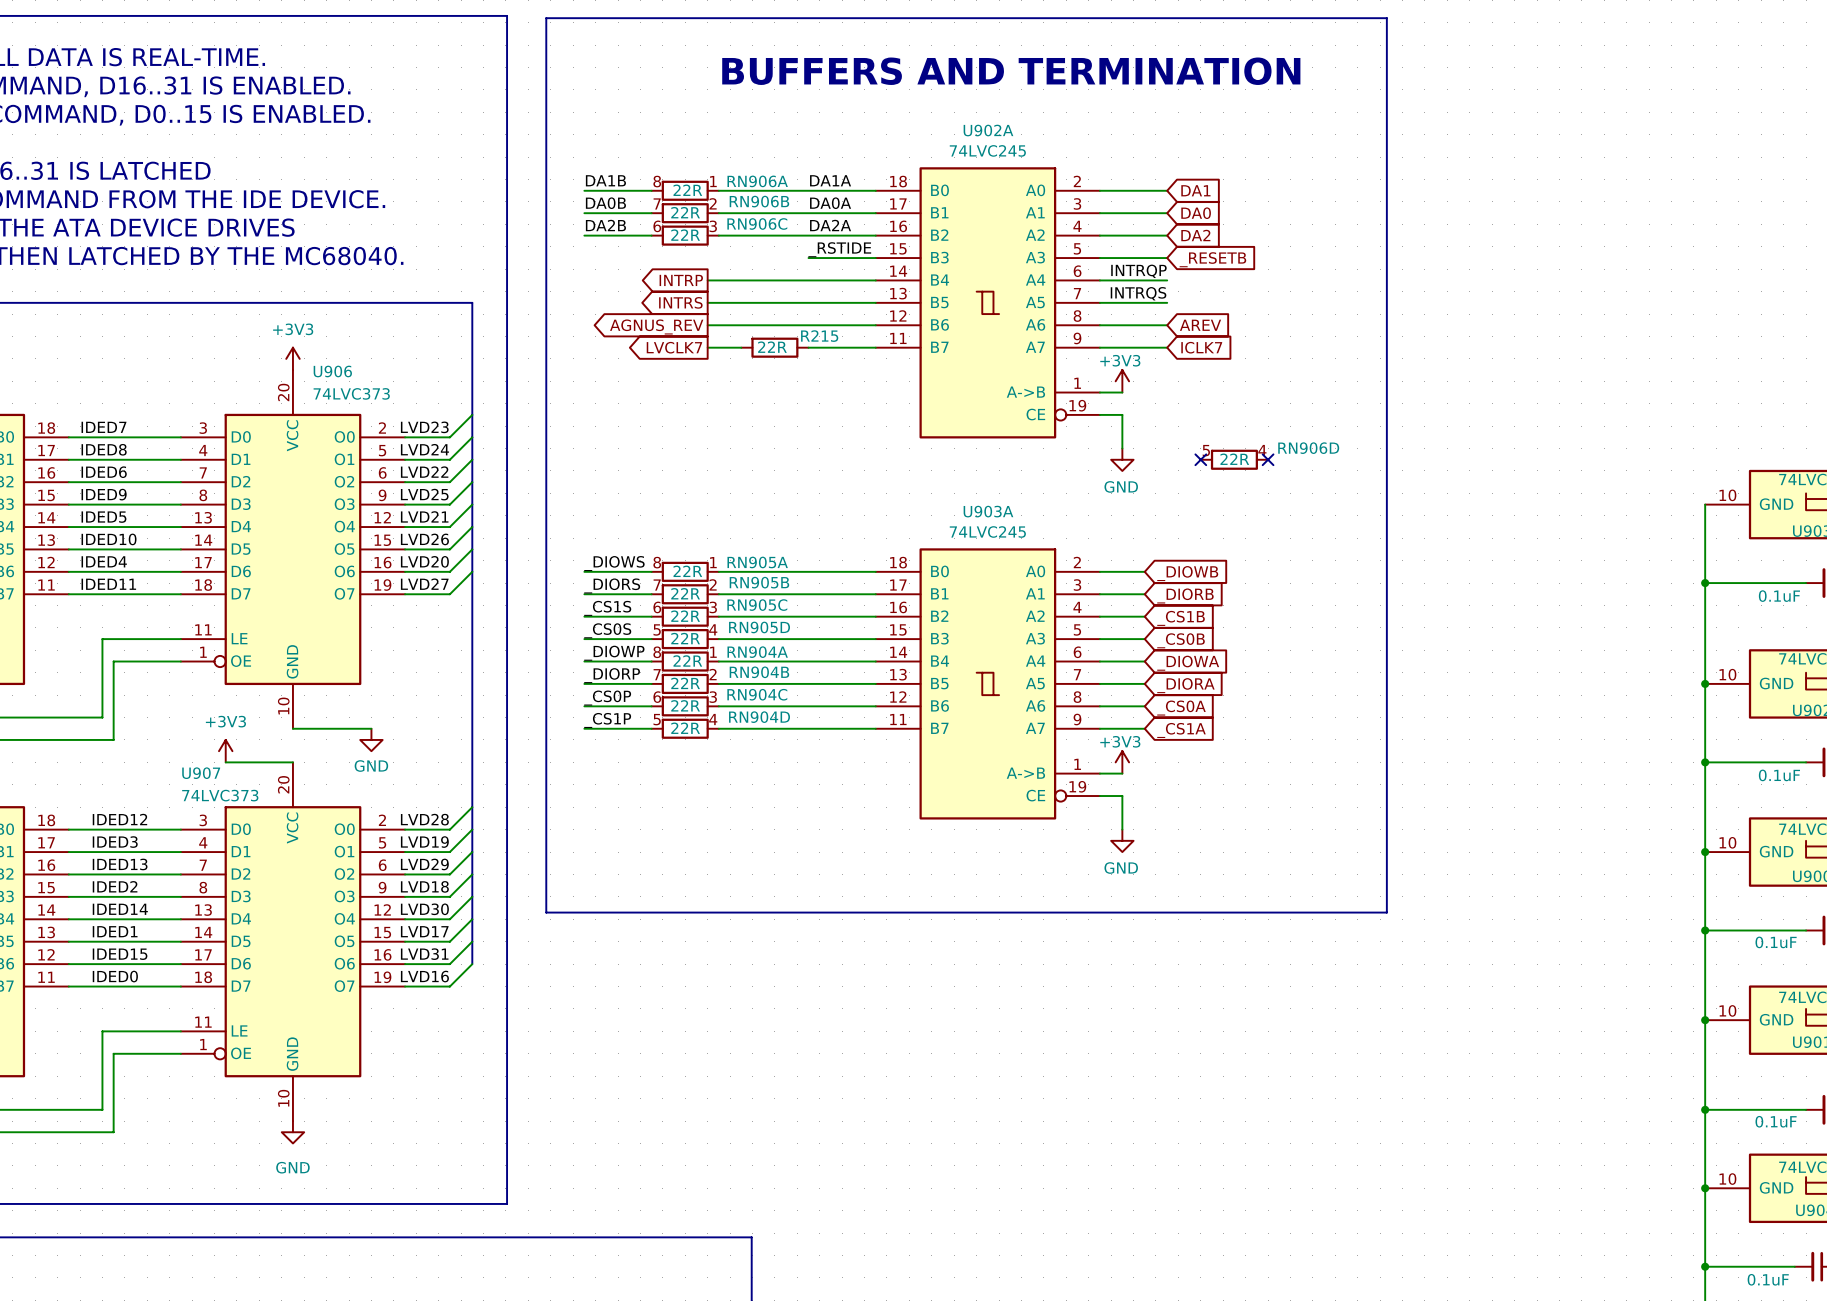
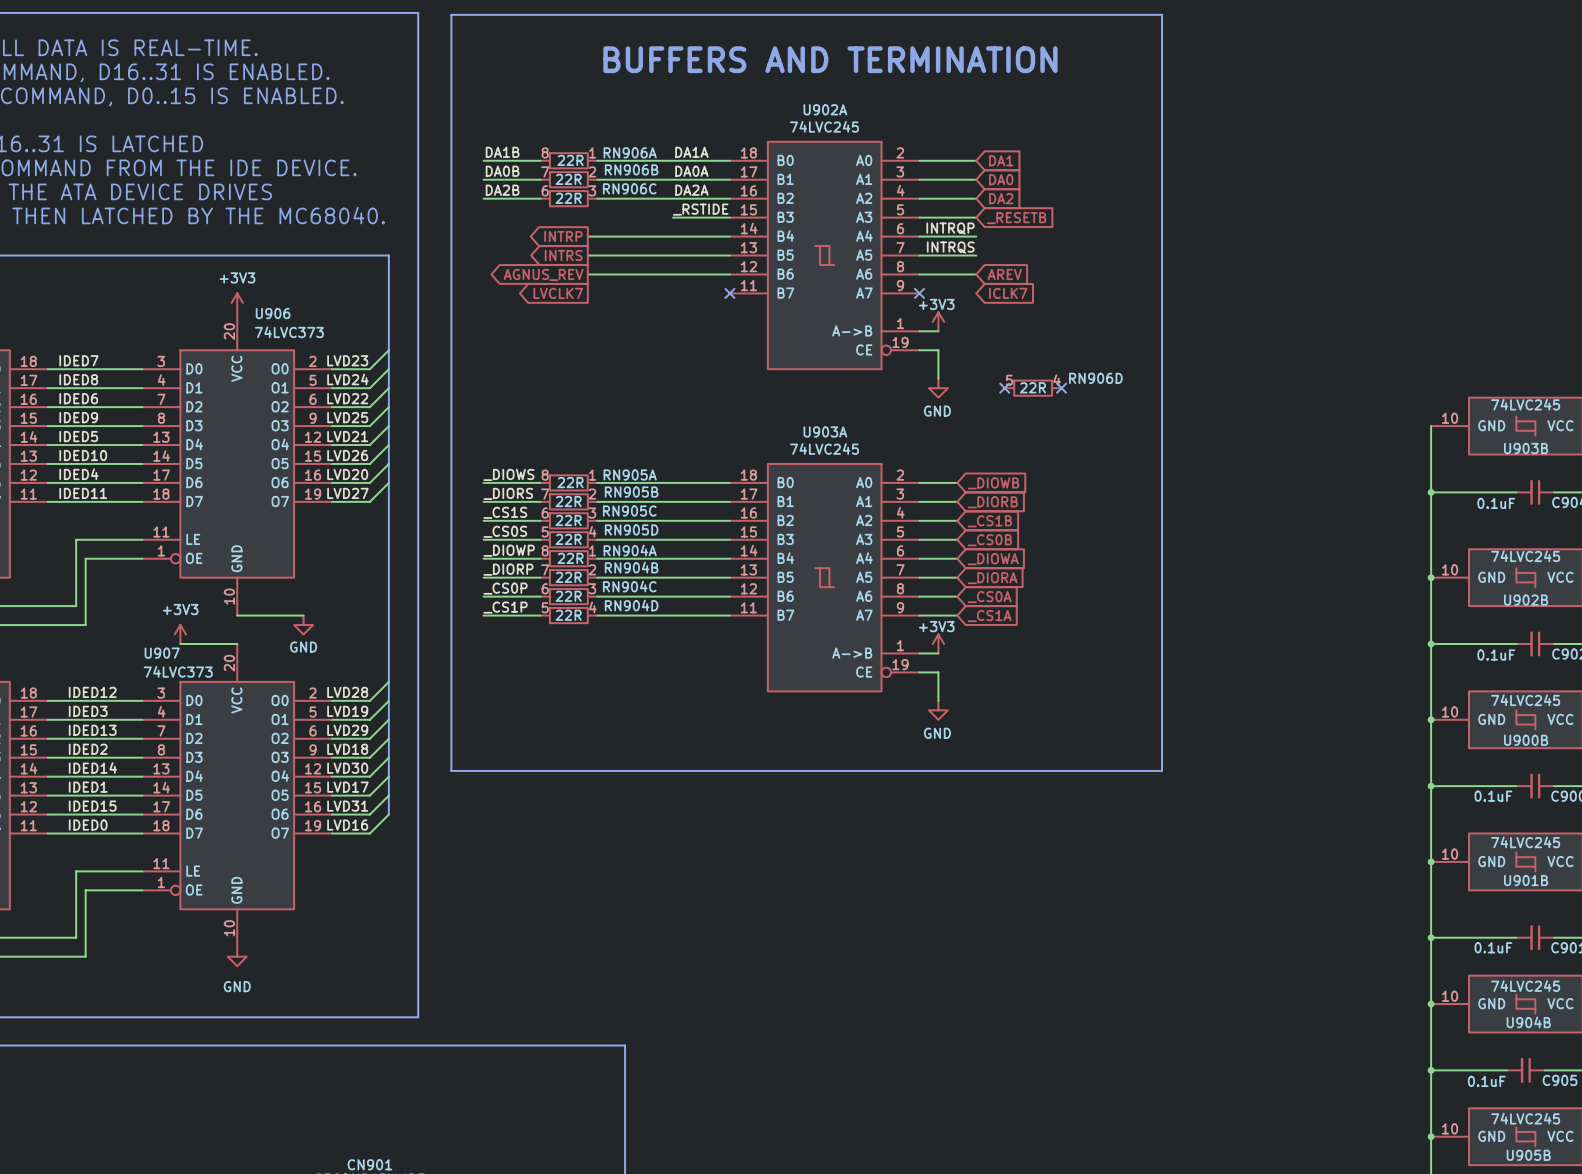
wire: (707, 347) (741, 347) -> none
R215: 22R (774, 347) -> none
wire: (808, 347) (875, 347) -> none
no-connect mark: none -> (729, 293)
wire: (1099, 347) (1167, 347) -> none
no-connect mark: none -> (919, 293)

